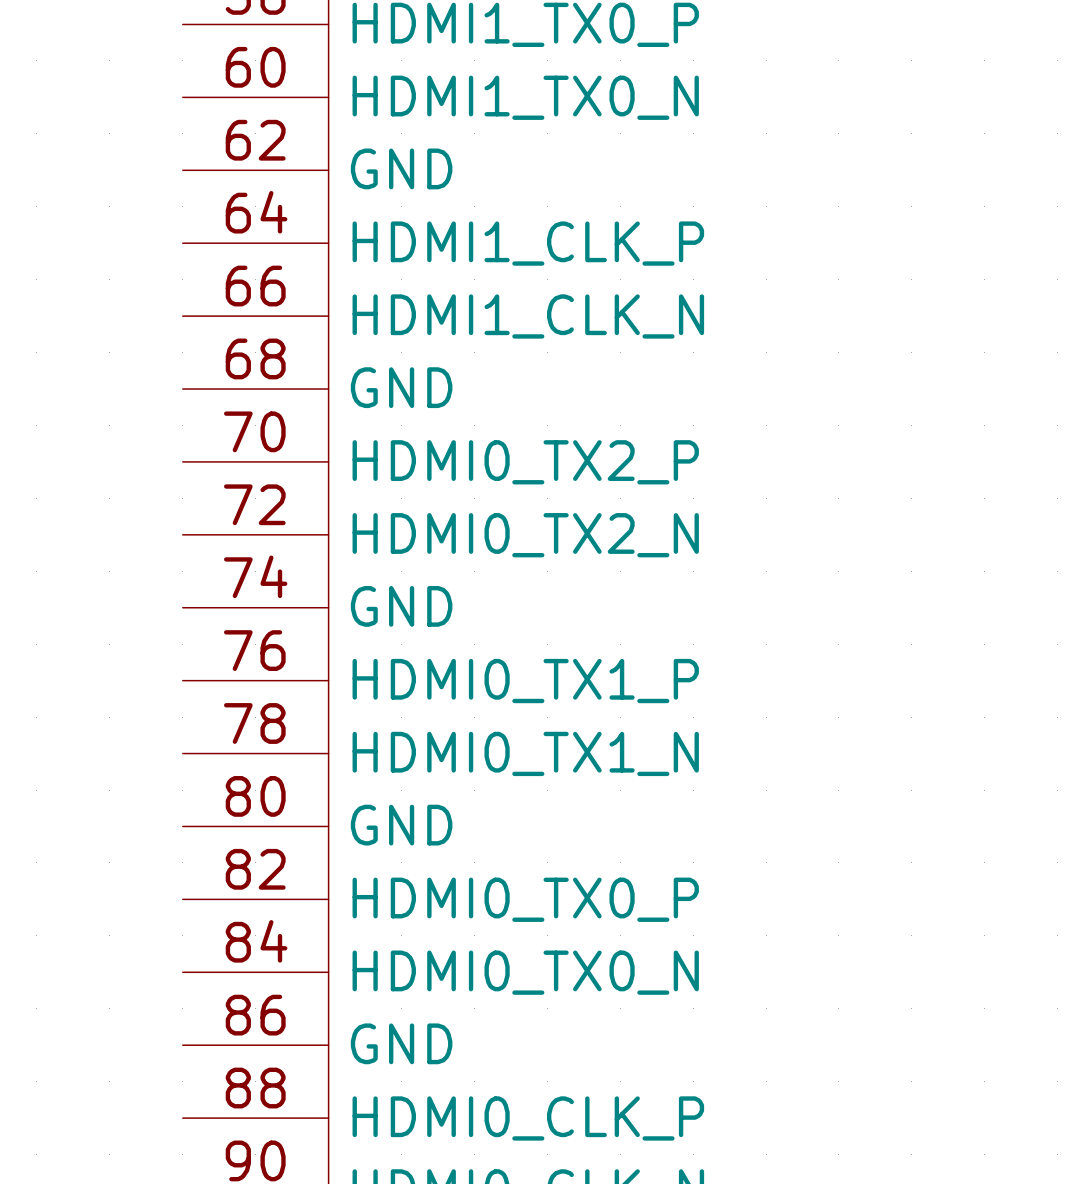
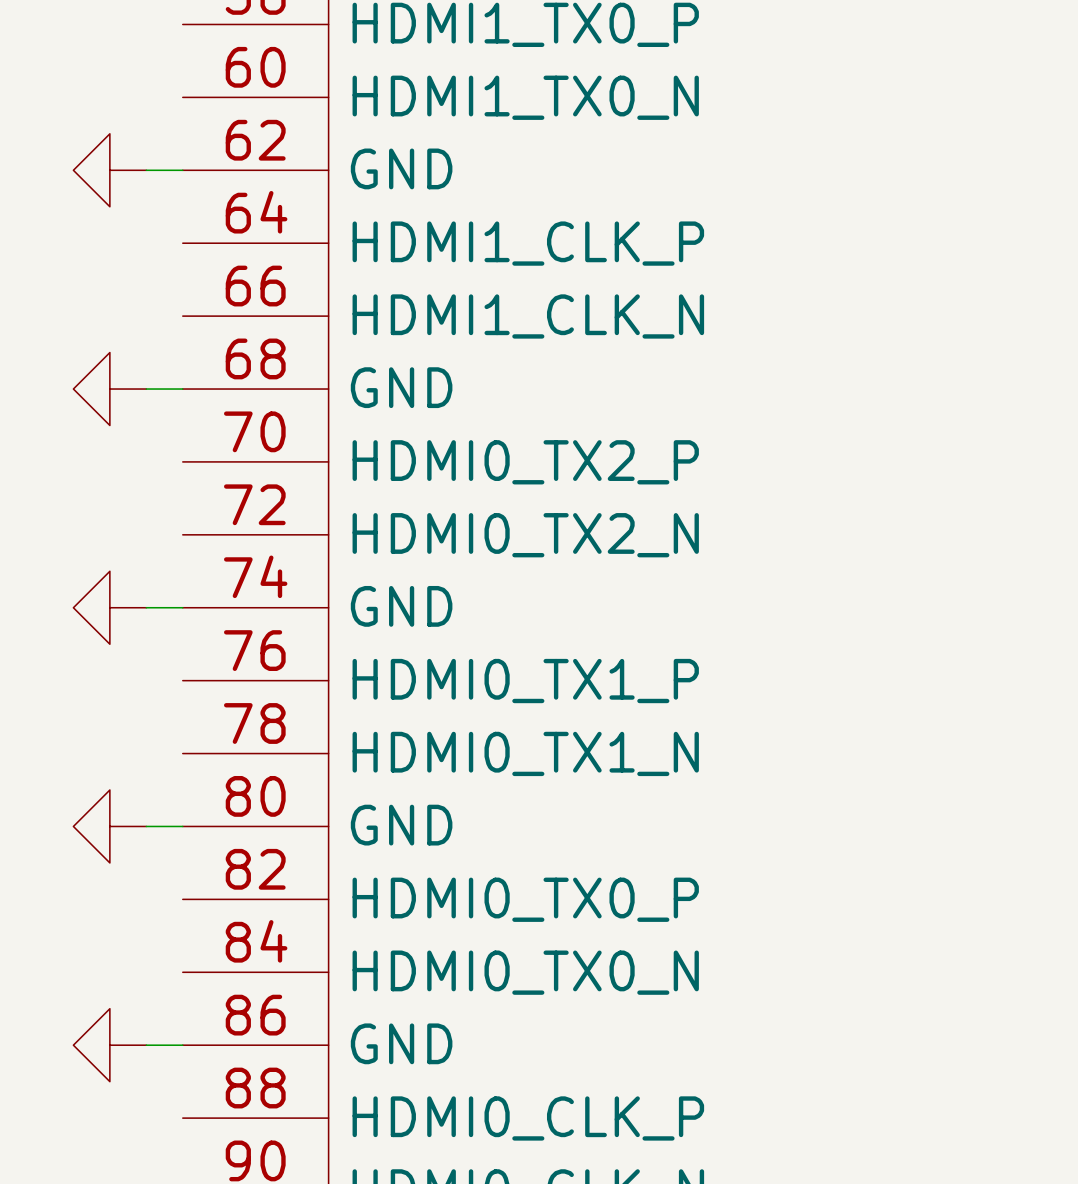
power symbol: none -> (109, 170)
wire: none -> (146, 170) (182, 170)
power symbol: none -> (109, 389)
wire: none -> (146, 389) (182, 389)
power symbol: none -> (109, 607)
wire: none -> (146, 607) (182, 607)
power symbol: none -> (109, 826)
wire: none -> (146, 826) (182, 826)
power symbol: none -> (109, 1045)
wire: none -> (146, 1045) (182, 1045)

